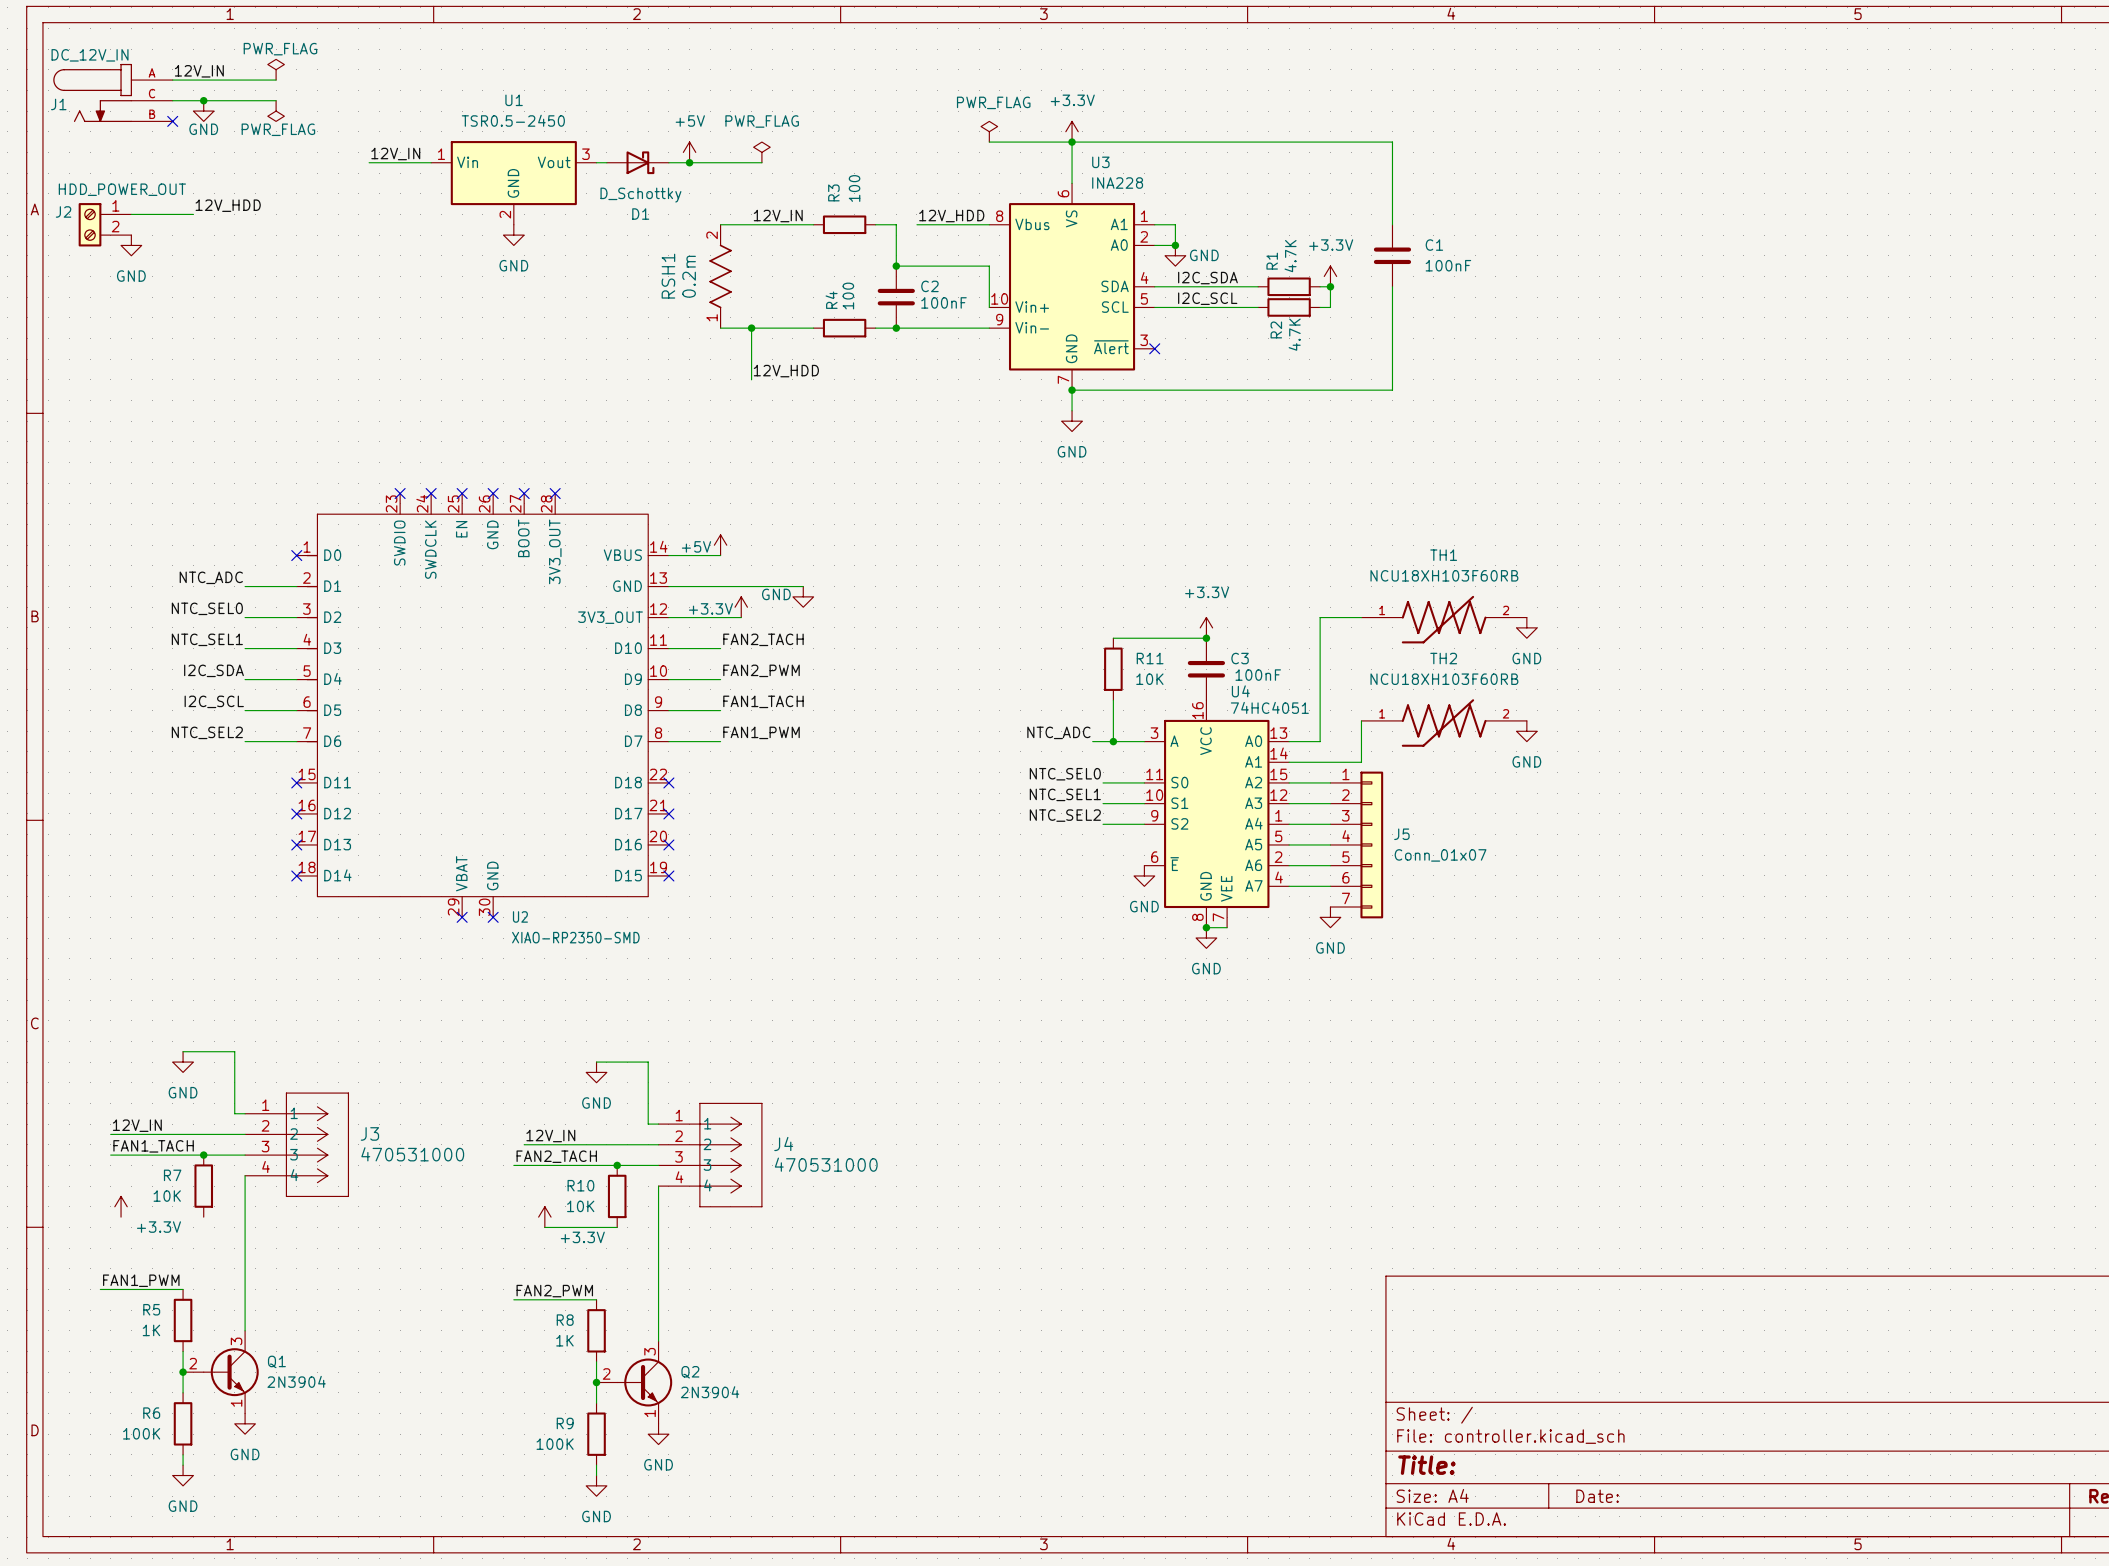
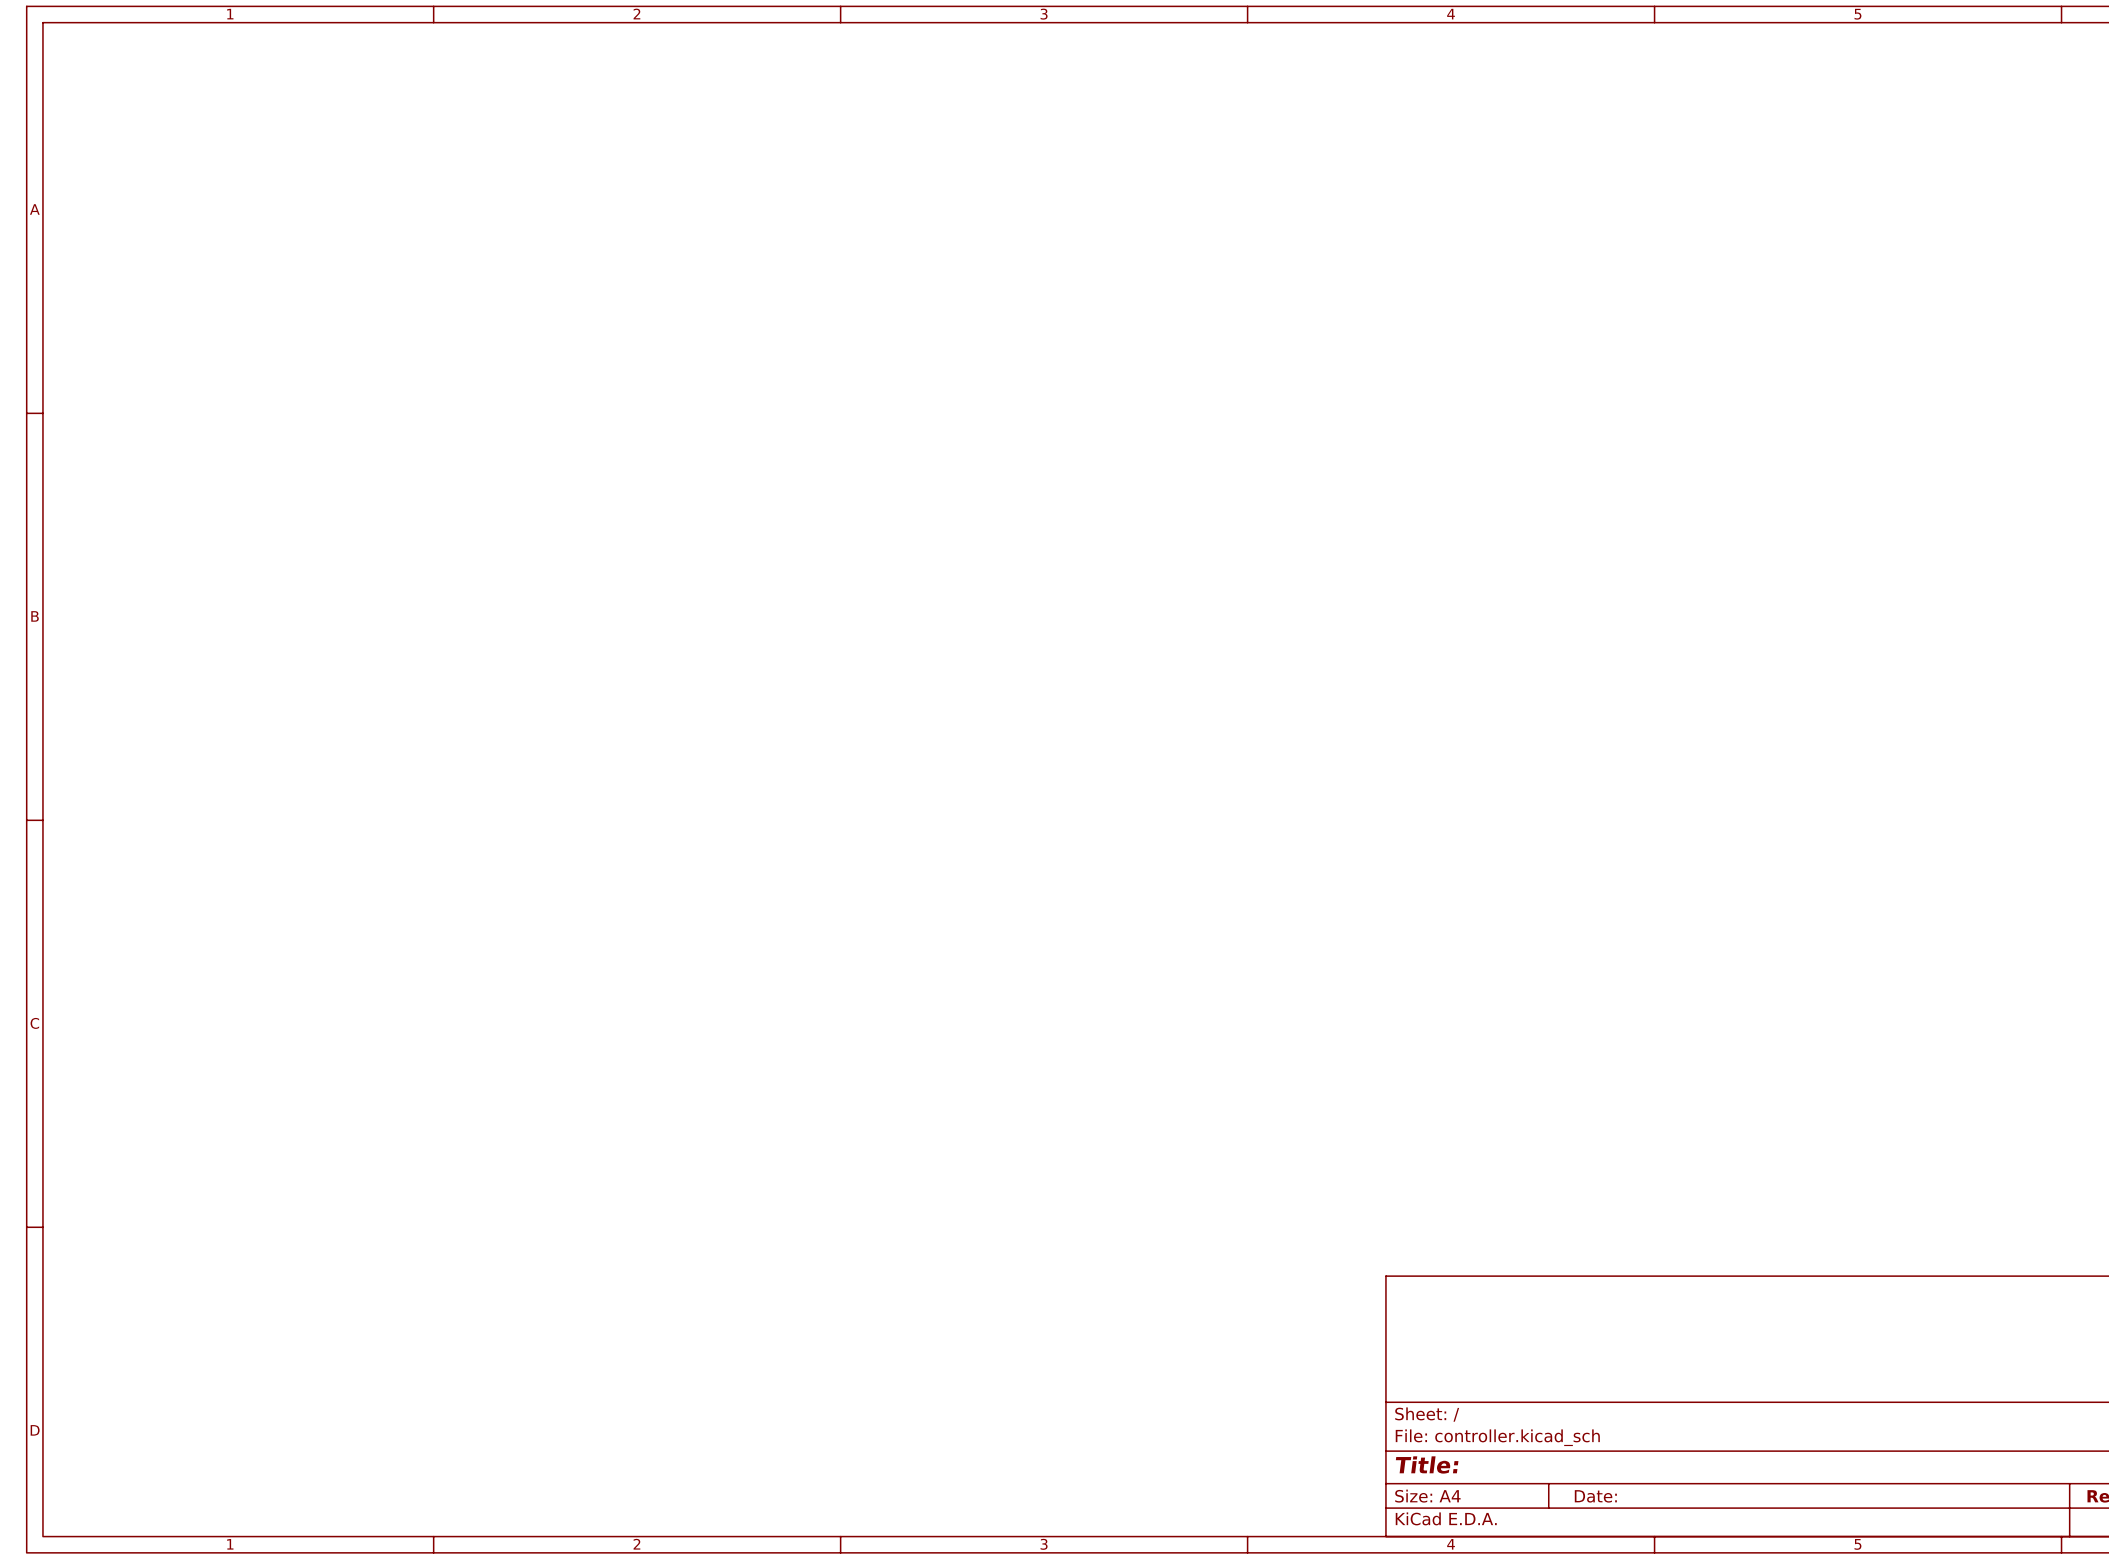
power symbol: PWR_FLAG (276, 69) -> none
label: 12V_IN (199, 71) -> none
wire: (172, 80) (276, 80) -> none
J1: DC_12V_IN (112, 92) -> none
wire: (172, 100) (276, 100) -> none
junction: (203, 100) -> none
power symbol: GND (203, 111) -> none
power symbol: PWR_FLAG (276, 111) -> none
no-connect mark: (172, 121) -> none
power symbol: PWR_FLAG (989, 131) -> none
power symbol: +3.3V (1072, 131) -> none
wire: (989, 142) (1392, 142) (1392, 224) -> none
wire: (1072, 142) (1072, 183) -> none
junction: (1072, 142) -> none
power symbol: +5V (689, 152) -> none
power symbol: PWR_FLAG (761, 152) -> none
label: 12V_IN (395, 154) -> none
wire: (369, 162) (431, 162) -> none
wire: (596, 162) (606, 162) -> none
D1: D_Schottky (637, 162) -> none
wire: (668, 162) (761, 162) -> none
junction: (689, 162) -> none
U1: TSR0.5-2450 (513, 182) -> none
label: 12V_HDD (228, 205) -> none
wire: (131, 214) (193, 214) -> none
label: 12V_IN (778, 216) -> none
label: 12V_HDD (951, 216) -> none
J2: HDD_POWER_OUT (105, 224) -> none
wire: (720, 224) (813, 224) -> none
R3: 100 (844, 224) -> none
wire: (875, 224) (896, 224) (896, 266) (989, 266) (989, 307) -> none
wire: (916, 224) (989, 224) -> none
wire: (1154, 224) (1175, 224) (1175, 245) (1154, 245) -> none
power symbol: GND (513, 235) -> none
power symbol: GND (131, 245) -> none
junction: (1175, 245) -> none
power symbol: GND (1175, 255) -> none
C1: 100nF (1392, 255) -> none
junction: (896, 266) -> none
RSH1: 0.2m (720, 276) -> none
power symbol: +3.3V (1330, 276) -> none
label: I2C_SDA (1207, 278) -> none
U3: INA228 (1072, 286) -> none
wire: (1154, 286) (1258, 286) -> none
R1: 4.7K (1289, 286) -> none
wire: (1320, 286) (1330, 286) (1330, 307) (1320, 307) -> none
junction: (1330, 286) -> none
wire: (1392, 286) (1392, 390) (1072, 390) (1072, 410) -> none
C2: 100nF (896, 297) -> none
label: I2C_SCL (1207, 298) -> none
wire: (1154, 307) (1258, 307) -> none
R2: 4.7K (1289, 307) -> none
wire: (720, 328) (813, 328) -> none
wire: (751, 328) (751, 379) -> none
junction: (751, 328) -> none
R4: 100 (844, 328) -> none
wire: (875, 328) (989, 328) -> none
junction: (896, 328) -> none
no-connect mark: (1154, 348) -> none
label: 12V_HDD (786, 371) -> none
junction: (1072, 390) -> none
power symbol: GND (1072, 421) -> none
no-connect mark: (400, 493) -> none
no-connect mark: (431, 493) -> none
no-connect mark: (462, 493) -> none
no-connect mark: (493, 493) -> none
no-connect mark: (524, 493) -> none
no-connect mark: (555, 493) -> none
power symbol: +5V (720, 545) -> none
no-connect mark: (296, 555) -> none
wire: (668, 555) (720, 555) -> none
label: NTC_ADC (211, 577) -> none
wire: (245, 586) (296, 586) -> none
wire: (668, 586) (803, 586) -> none
power symbol: GND (803, 596) -> none
power symbol: +3.3V (741, 607) -> none
label: NTC_SEL0 (207, 608) -> none
wire: (245, 617) (296, 617) -> none
wire: (668, 617) (741, 617) -> none
wire: (1361, 617) (1320, 617) (1320, 741) (1289, 741) -> none
TH1: NCU18XH103F60RB (1444, 619) -> none
power symbol: +3.3V (1206, 627) -> none
power symbol: GND (1526, 627) -> none
wire: (1113, 638) (1206, 638) -> none
junction: (1206, 638) -> none
label: NTC_SEL1 (207, 639) -> none
label: FAN2_TACH (763, 639) -> none
wire: (245, 648) (296, 648) -> none
wire: (668, 648) (720, 648) -> none
R11: 10K (1113, 669) -> none
C3: 100nF (1206, 669) -> none
label: I2C_SDA (213, 670) -> none
label: FAN2_PWM (761, 670) -> none
wire: (245, 679) (296, 679) -> none
wire: (668, 679) (720, 679) -> none
wire: (1113, 700) (1113, 741) -> none
label: I2C_SCL (214, 701) -> none
label: FAN1_TACH (763, 701) -> none
U2: XIAO-RP2350-SMD (482, 705) -> none
wire: (245, 710) (296, 710) -> none
wire: (668, 710) (720, 710) -> none
wire: (1361, 720) (1361, 762) (1289, 762) -> none
TH2: NCU18XH103F60RB (1444, 723) -> none
power symbol: GND (1526, 731) -> none
label: NTC_SEL2 (207, 732) -> none
label: FAN1_PWM (761, 732) -> none
label: NTC_ADC (1058, 732) -> none
wire: (245, 741) (296, 741) -> none
wire: (668, 741) (720, 741) -> none
wire: (1092, 741) (1144, 741) -> none
junction: (1113, 741) -> none
label: NTC_SEL0 (1065, 774) -> none
no-connect mark: (296, 782) -> none
no-connect mark: (668, 782) -> none
wire: (1103, 782) (1144, 782) -> none
wire: (1289, 782) (1330, 782) -> none
label: NTC_SEL1 (1065, 794) -> none
wire: (1103, 803) (1144, 803) -> none
wire: (1289, 803) (1330, 803) -> none
no-connect mark: (296, 813) -> none
no-connect mark: (668, 813) -> none
U4: 74HC4051 (1216, 813) -> none
label: NTC_SEL2 (1065, 815) -> none
wire: (1103, 824) (1144, 824) -> none
wire: (1289, 824) (1330, 824) -> none
no-connect mark: (296, 844) -> none
no-connect mark: (668, 844) -> none
wire: (1289, 844) (1330, 844) -> none
J5: Conn_01x07 (1356, 844) -> none
wire: (1289, 865) (1330, 865) -> none
no-connect mark: (296, 875) -> none
no-connect mark: (668, 875) -> none
power symbol: GND (1144, 875) -> none
wire: (1289, 886) (1330, 886) -> none
no-connect mark: (462, 917) -> none
no-connect mark: (493, 917) -> none
power symbol: GND (1330, 917) -> none
wire: (1206, 927) (1227, 927) -> none
junction: (1206, 927) -> none
power symbol: GND (1206, 938) -> none
wire: (183, 1051) (234, 1051) (234, 1113) (245, 1113) -> none
power symbol: GND (183, 1062) -> none
wire: (596, 1062) (648, 1062) (648, 1124) (658, 1124) -> none
power symbol: GND (596, 1072) -> none
label: 12V_IN (137, 1125) -> none
wire: (110, 1134) (245, 1134) -> none
label: 12V_IN (550, 1136) -> none
J3: 470531000 (297, 1144) -> none
wire: (524, 1144) (658, 1144) -> none
label: FAN1_TACH (153, 1146) -> none
wire: (110, 1155) (245, 1155) -> none
junction: (203, 1155) -> none
J4: 470531000 (710, 1155) -> none
label: FAN2_TACH (556, 1156) -> none
wire: (513, 1165) (658, 1165) -> none
junction: (617, 1165) -> none
wire: (245, 1175) (245, 1330) -> none
R7: 10K (203, 1186) -> none
wire: (658, 1186) (658, 1341) -> none
R10: 10K (617, 1196) -> none
power symbol: +3.3V (121, 1206) -> none
power symbol: +3.3V (544, 1217) -> none
wire: (544, 1227) (617, 1227) -> none
label: FAN1_PWM (141, 1280) -> none
wire: (100, 1289) (183, 1289) -> none
label: FAN2_PWM (554, 1291) -> none
wire: (513, 1299) (596, 1299) -> none
R5: 1K (183, 1320) -> none
R8: 1K (596, 1330) -> none
wire: (183, 1351) (183, 1392) -> none
wire: (596, 1361) (596, 1403) -> none
junction: (183, 1372) -> none
Q1: 2N3904 (220, 1372) -> none
junction: (596, 1382) -> none
Q2: 2N3904 (634, 1382) -> none
R6: 100K (183, 1423) -> none
power symbol: GND (245, 1423) -> none
R9: 100K (596, 1434) -> none
power symbol: GND (658, 1434) -> none
wire: (183, 1454) (183, 1465) -> none
wire: (596, 1465) (596, 1475) -> none
power symbol: GND (183, 1475) -> none
power symbol: GND (596, 1485) -> none

